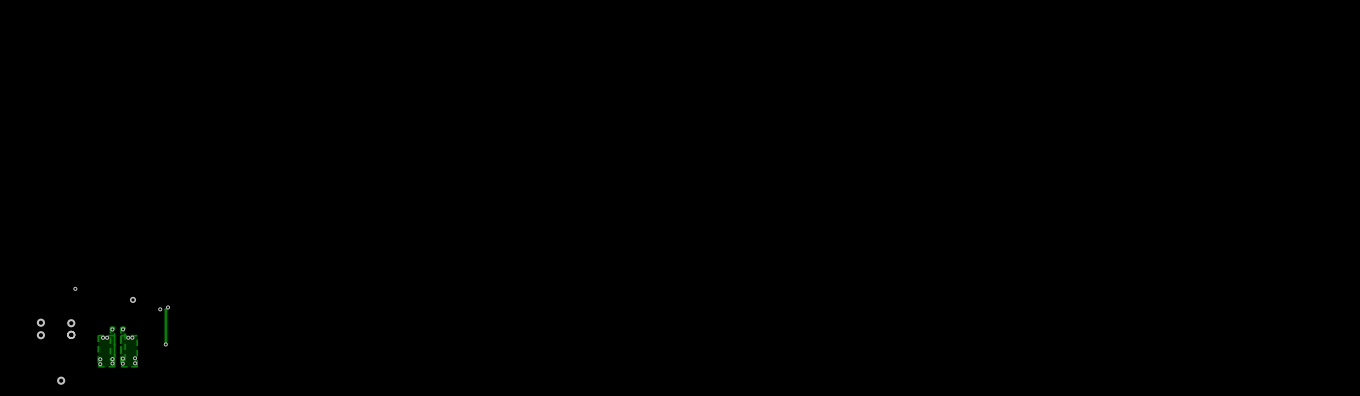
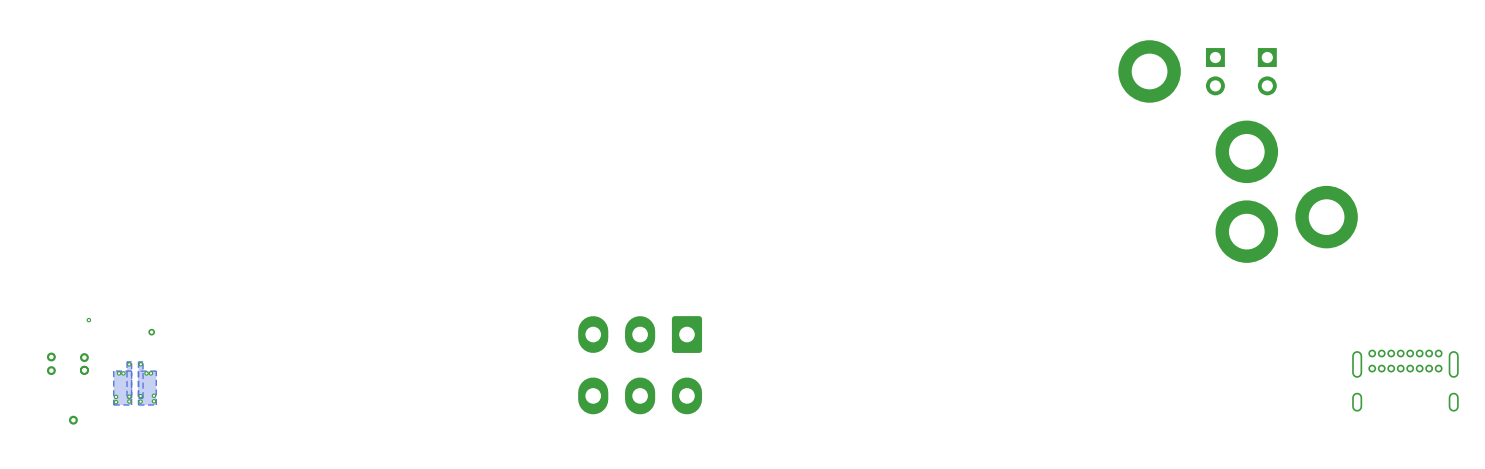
part: none -> (1149, 71)
part: none -> (1215, 71)
part: none -> (1267, 71)
part: none -> (1246, 151)
part: none -> (1326, 217)
part: none -> (1246, 231)
track: (168, 307) (165, 309) (165, 344) -> none
via: (168, 307) -> none
via: (160, 309) -> none
part: none -> (640, 365)
via: (165, 344) -> none
part: none -> (1405, 380)

